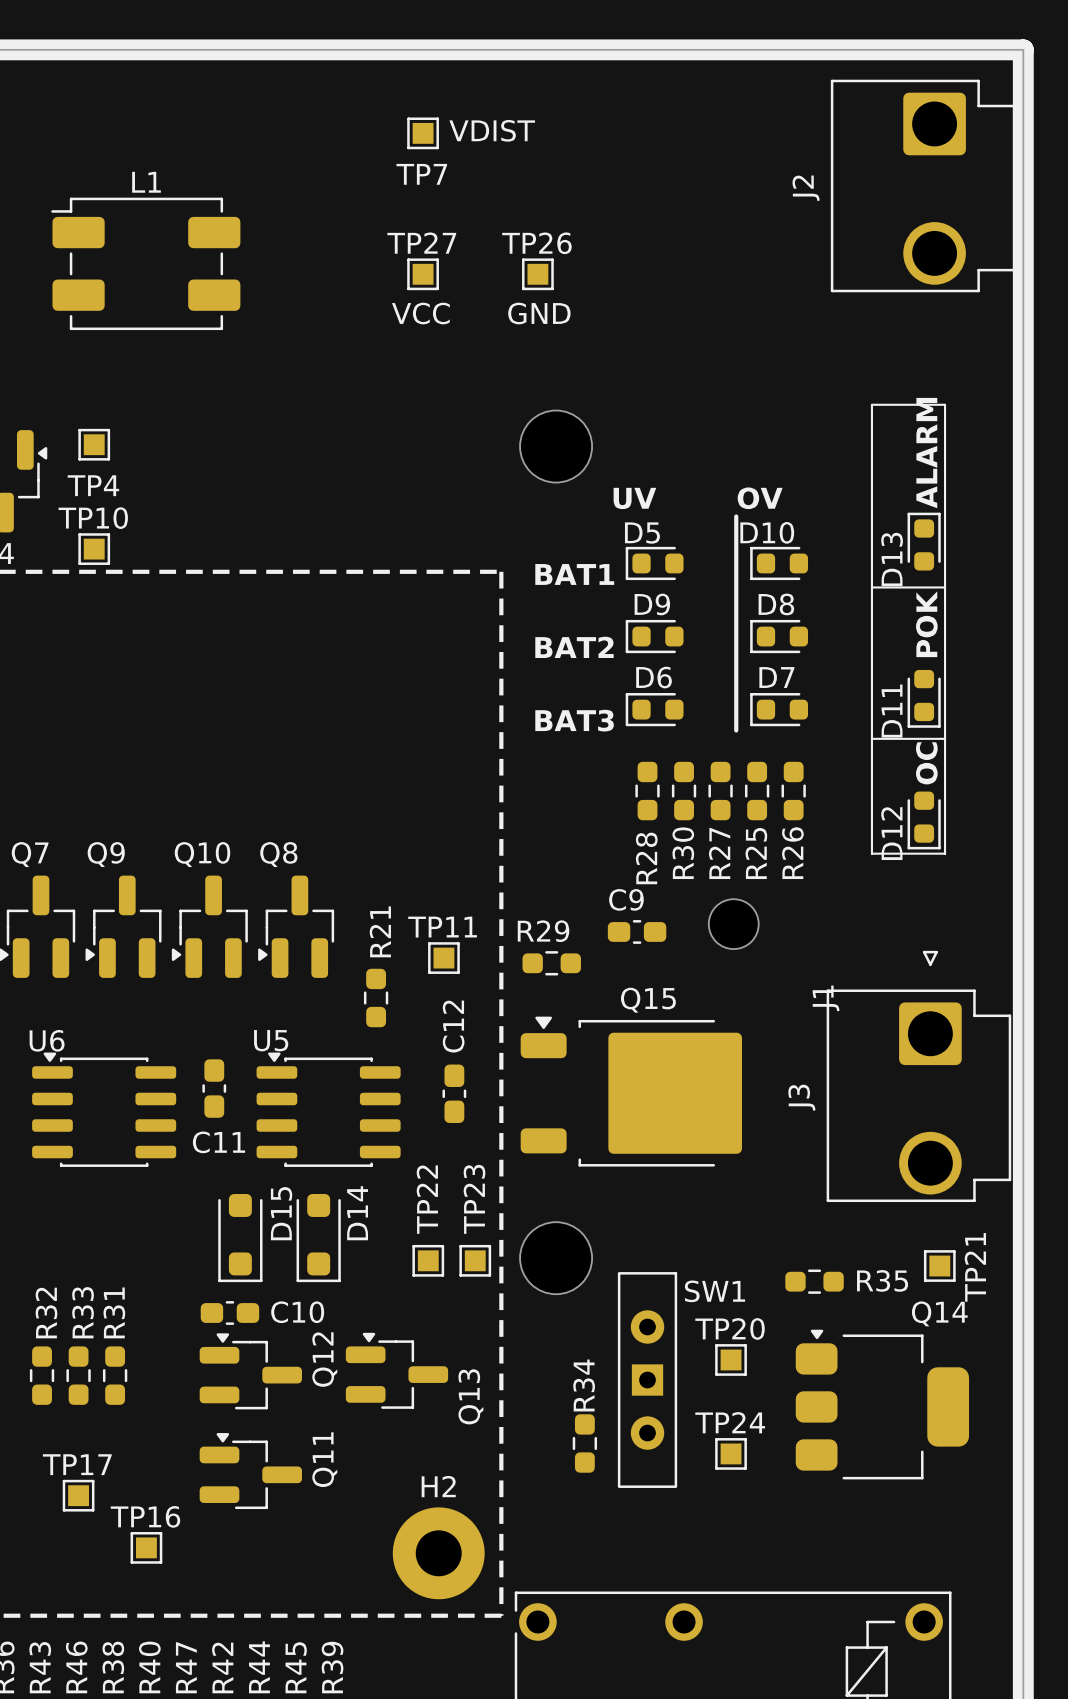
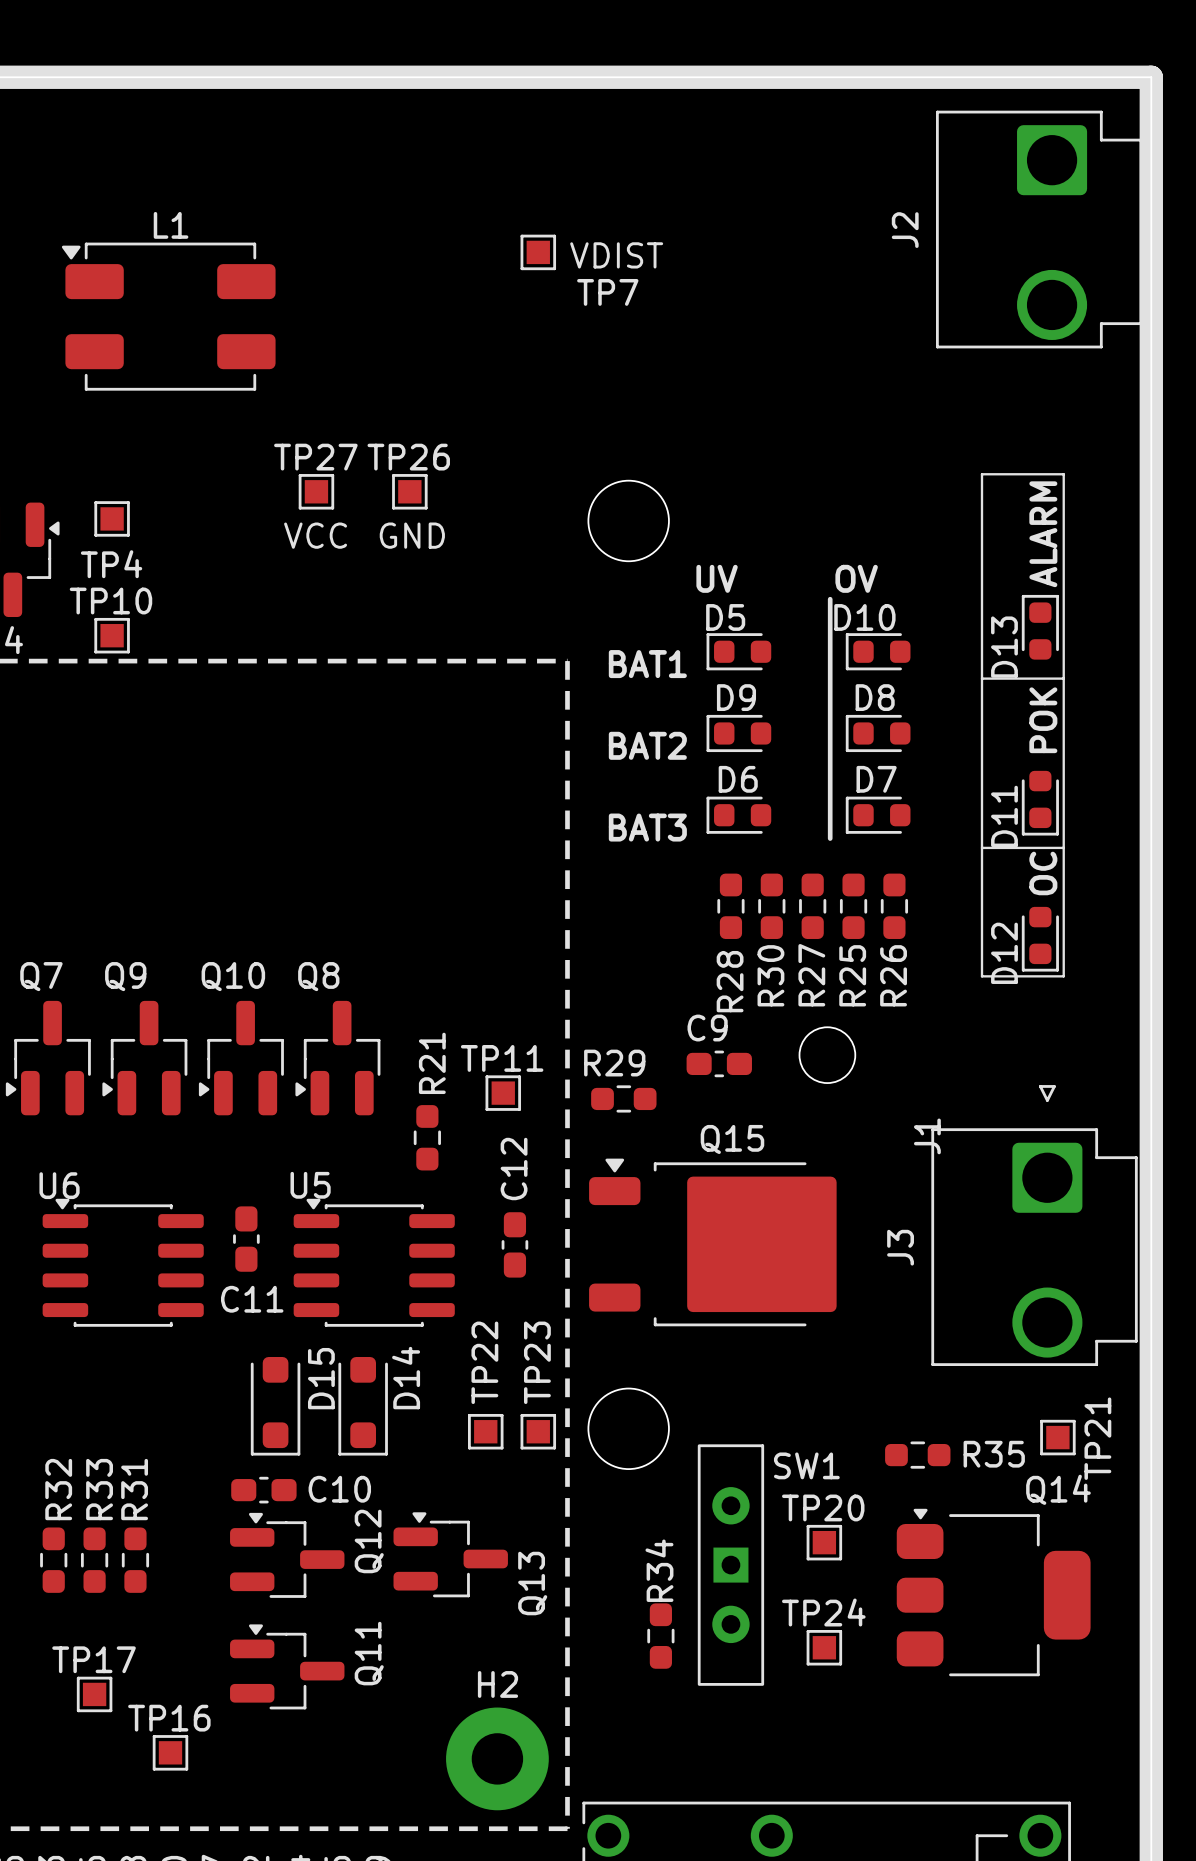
text position: VDIST (492, 130) -> VDIST (616, 255)
TP7 position: (423, 133) -> (538, 252)
TP7 name position: TP7 (421, 174) -> TP7 (607, 292)
L1 footprint: [51, 197, 241, 331] -> [61, 242, 276, 391]
TP27 position: (423, 274) -> (316, 491)
TP26 position: (537, 274) -> (409, 491)
text position: VCC (420, 313) -> VCC (315, 535)
text position: GND (539, 313) -> GND (412, 535)

